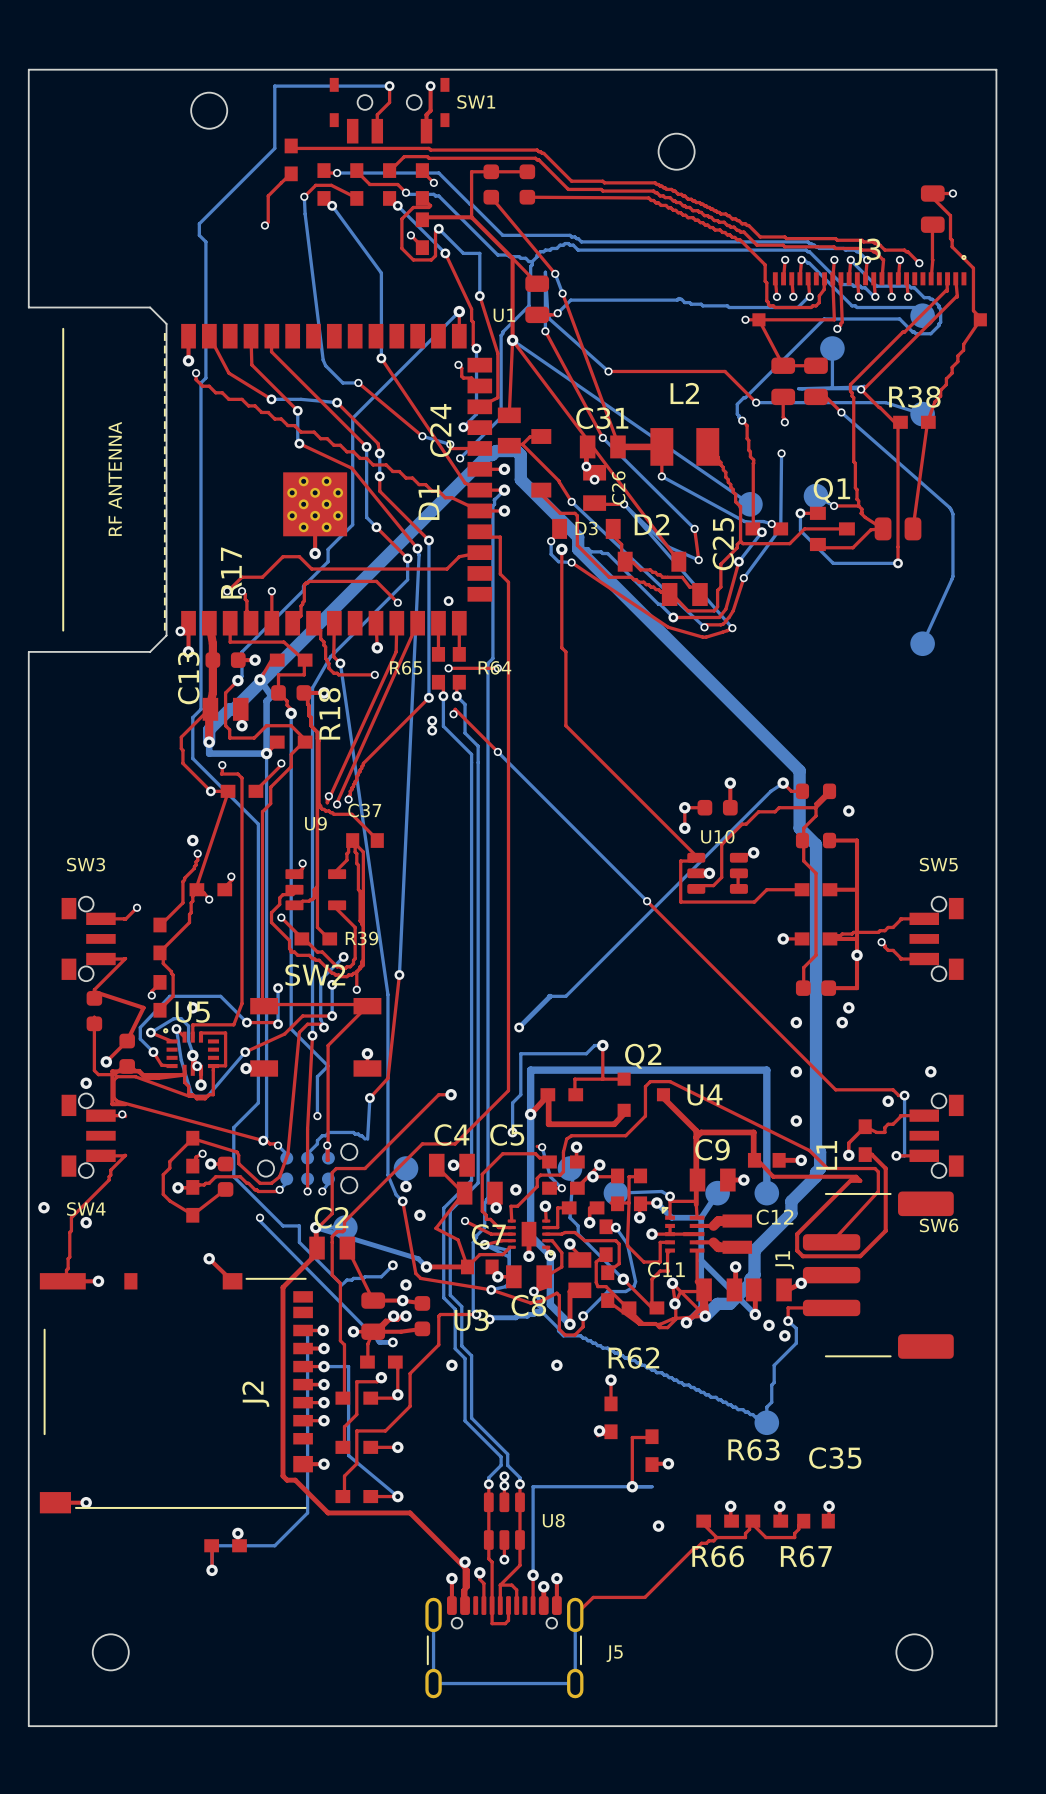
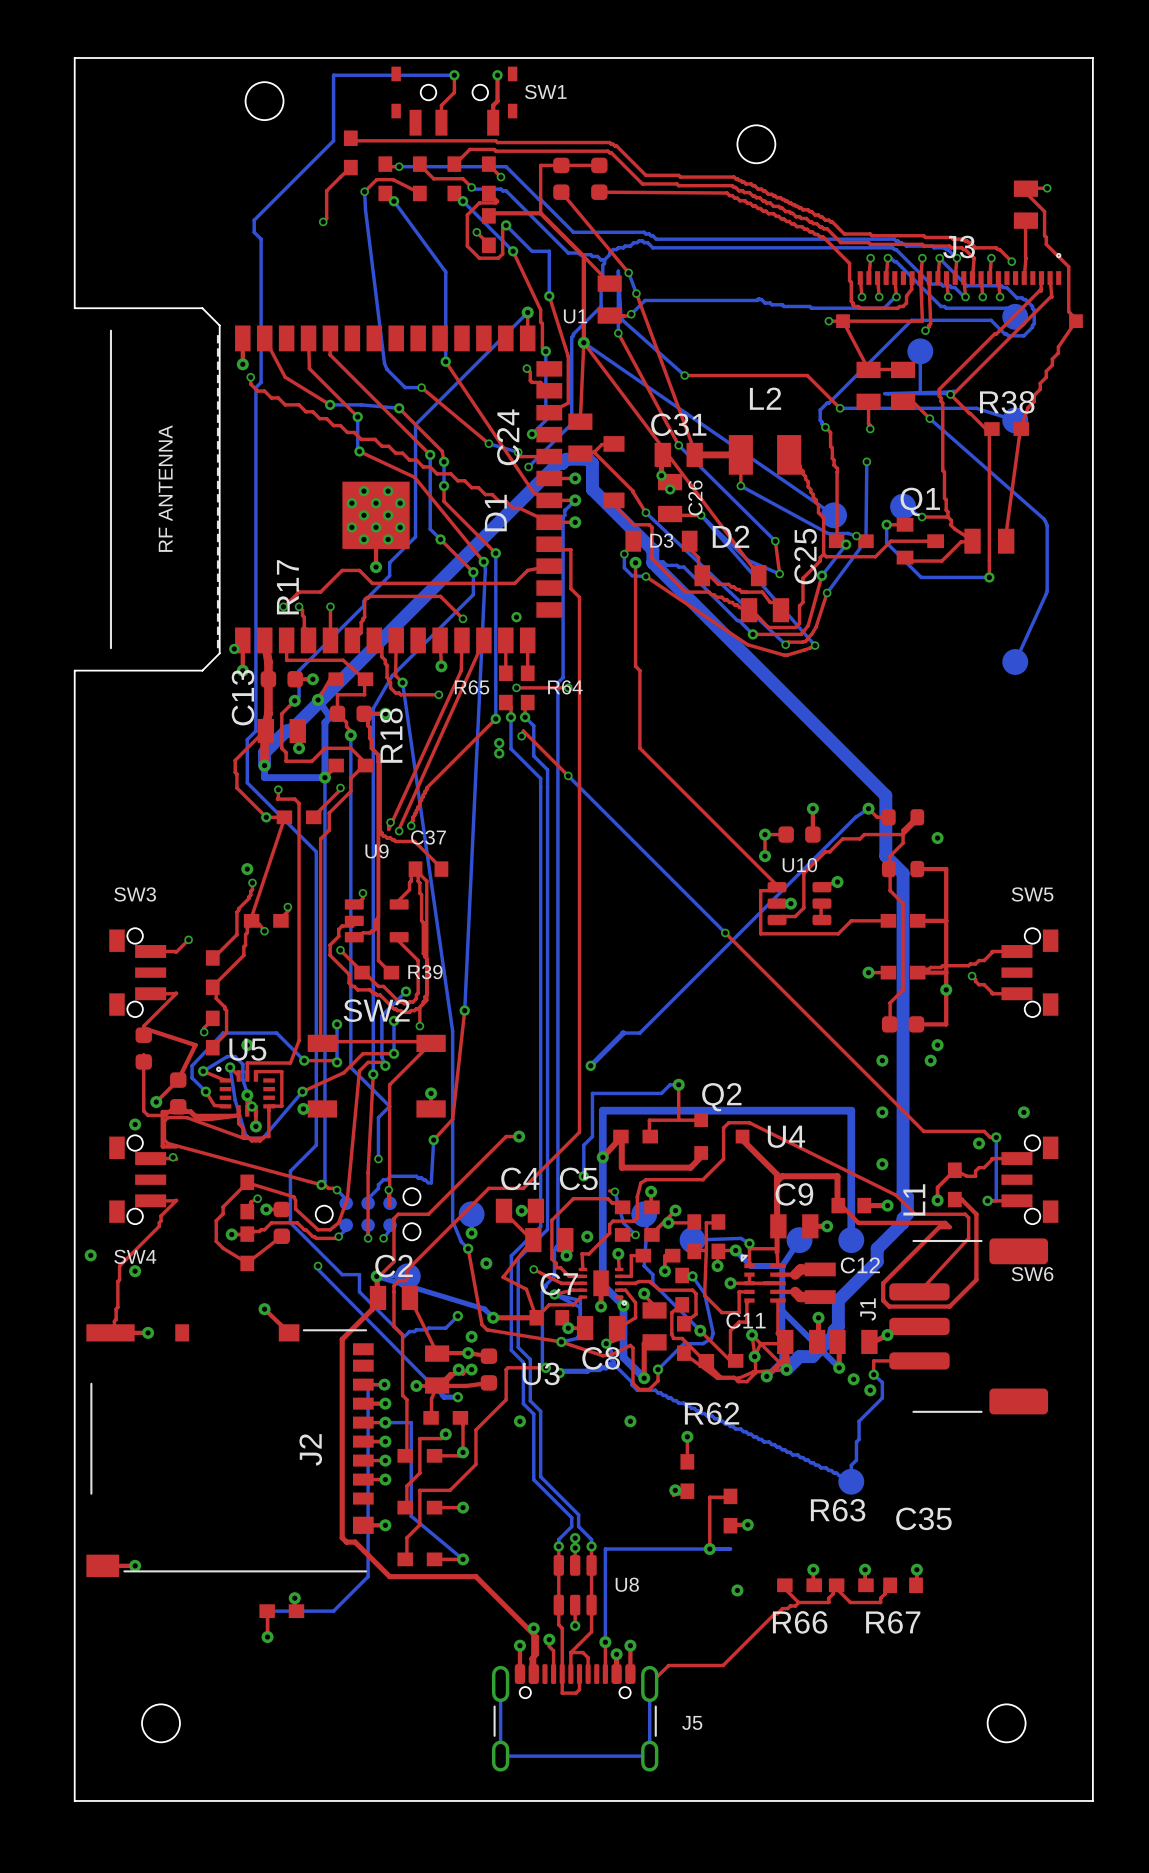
part footprint: [920, 185, 945, 233] -> [1013, 180, 1039, 229]
part footprint: [525, 275, 550, 324] -> [597, 275, 622, 324]
part footprint: [771, 357, 796, 406] -> [856, 361, 881, 411]
part footprint: [804, 357, 828, 406] -> [890, 361, 916, 411]
part footprint: [874, 517, 922, 541] -> [964, 528, 1015, 554]
part footprint: [361, 1292, 386, 1340] -> [425, 1345, 450, 1394]

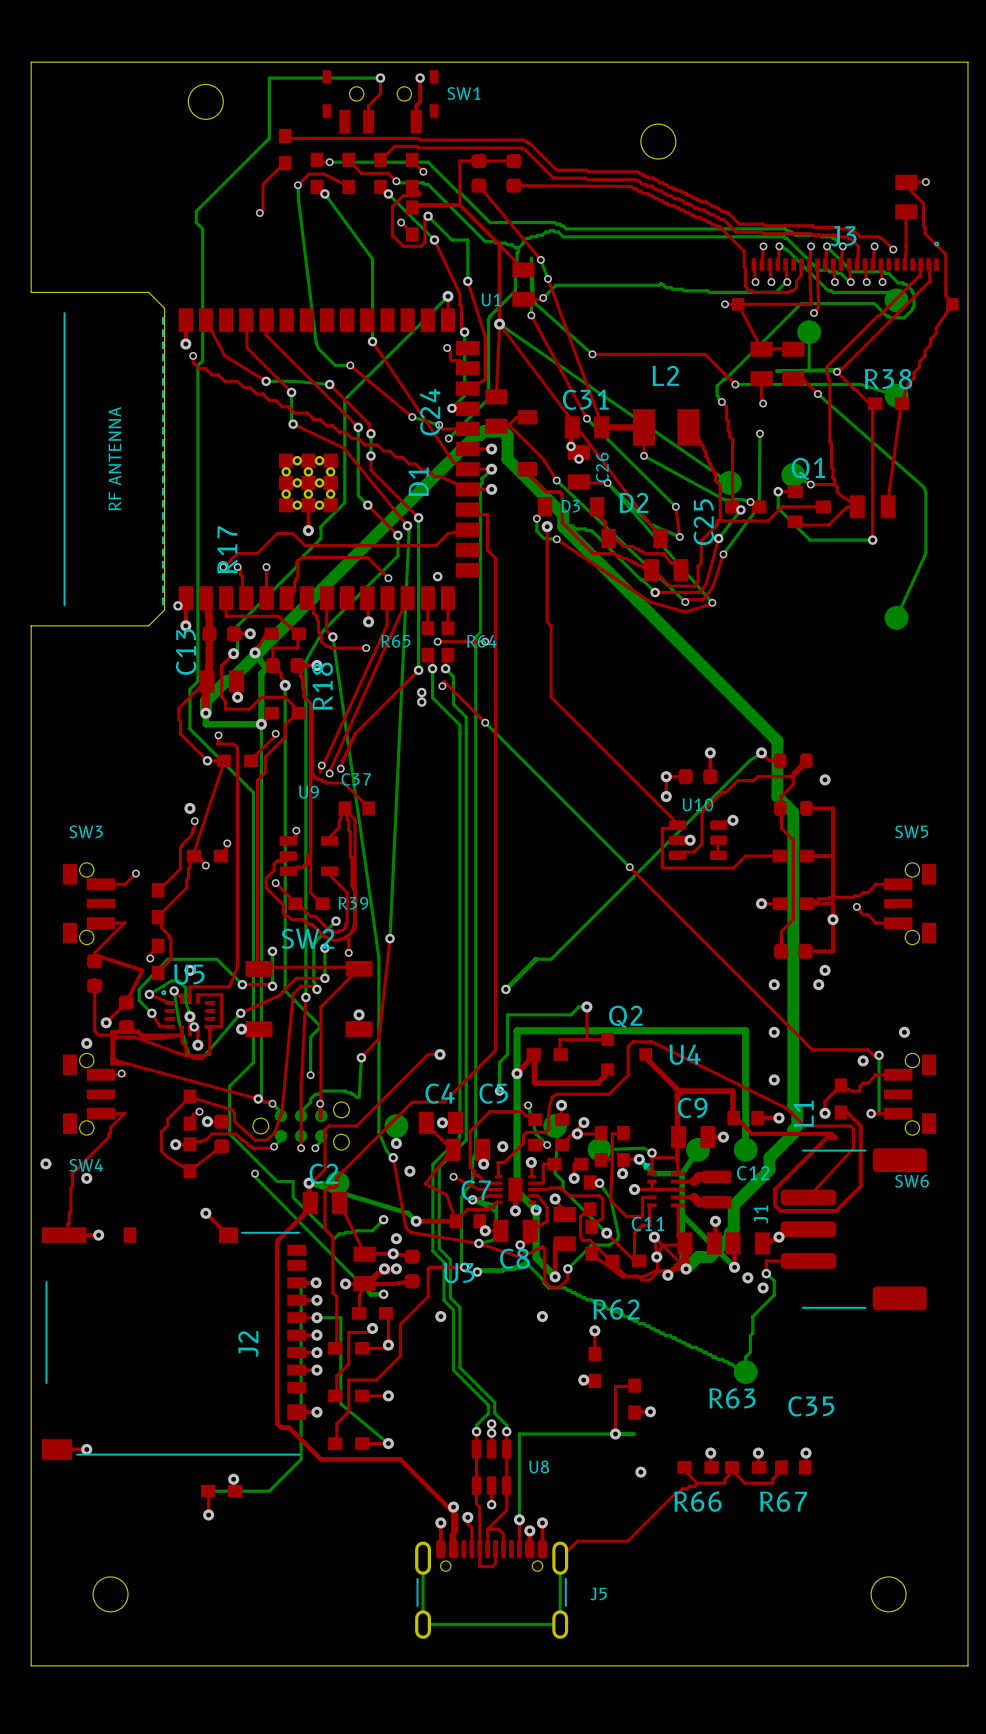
U1 footprint: [109, 325, 563, 654] -> [63, 308, 480, 610]

